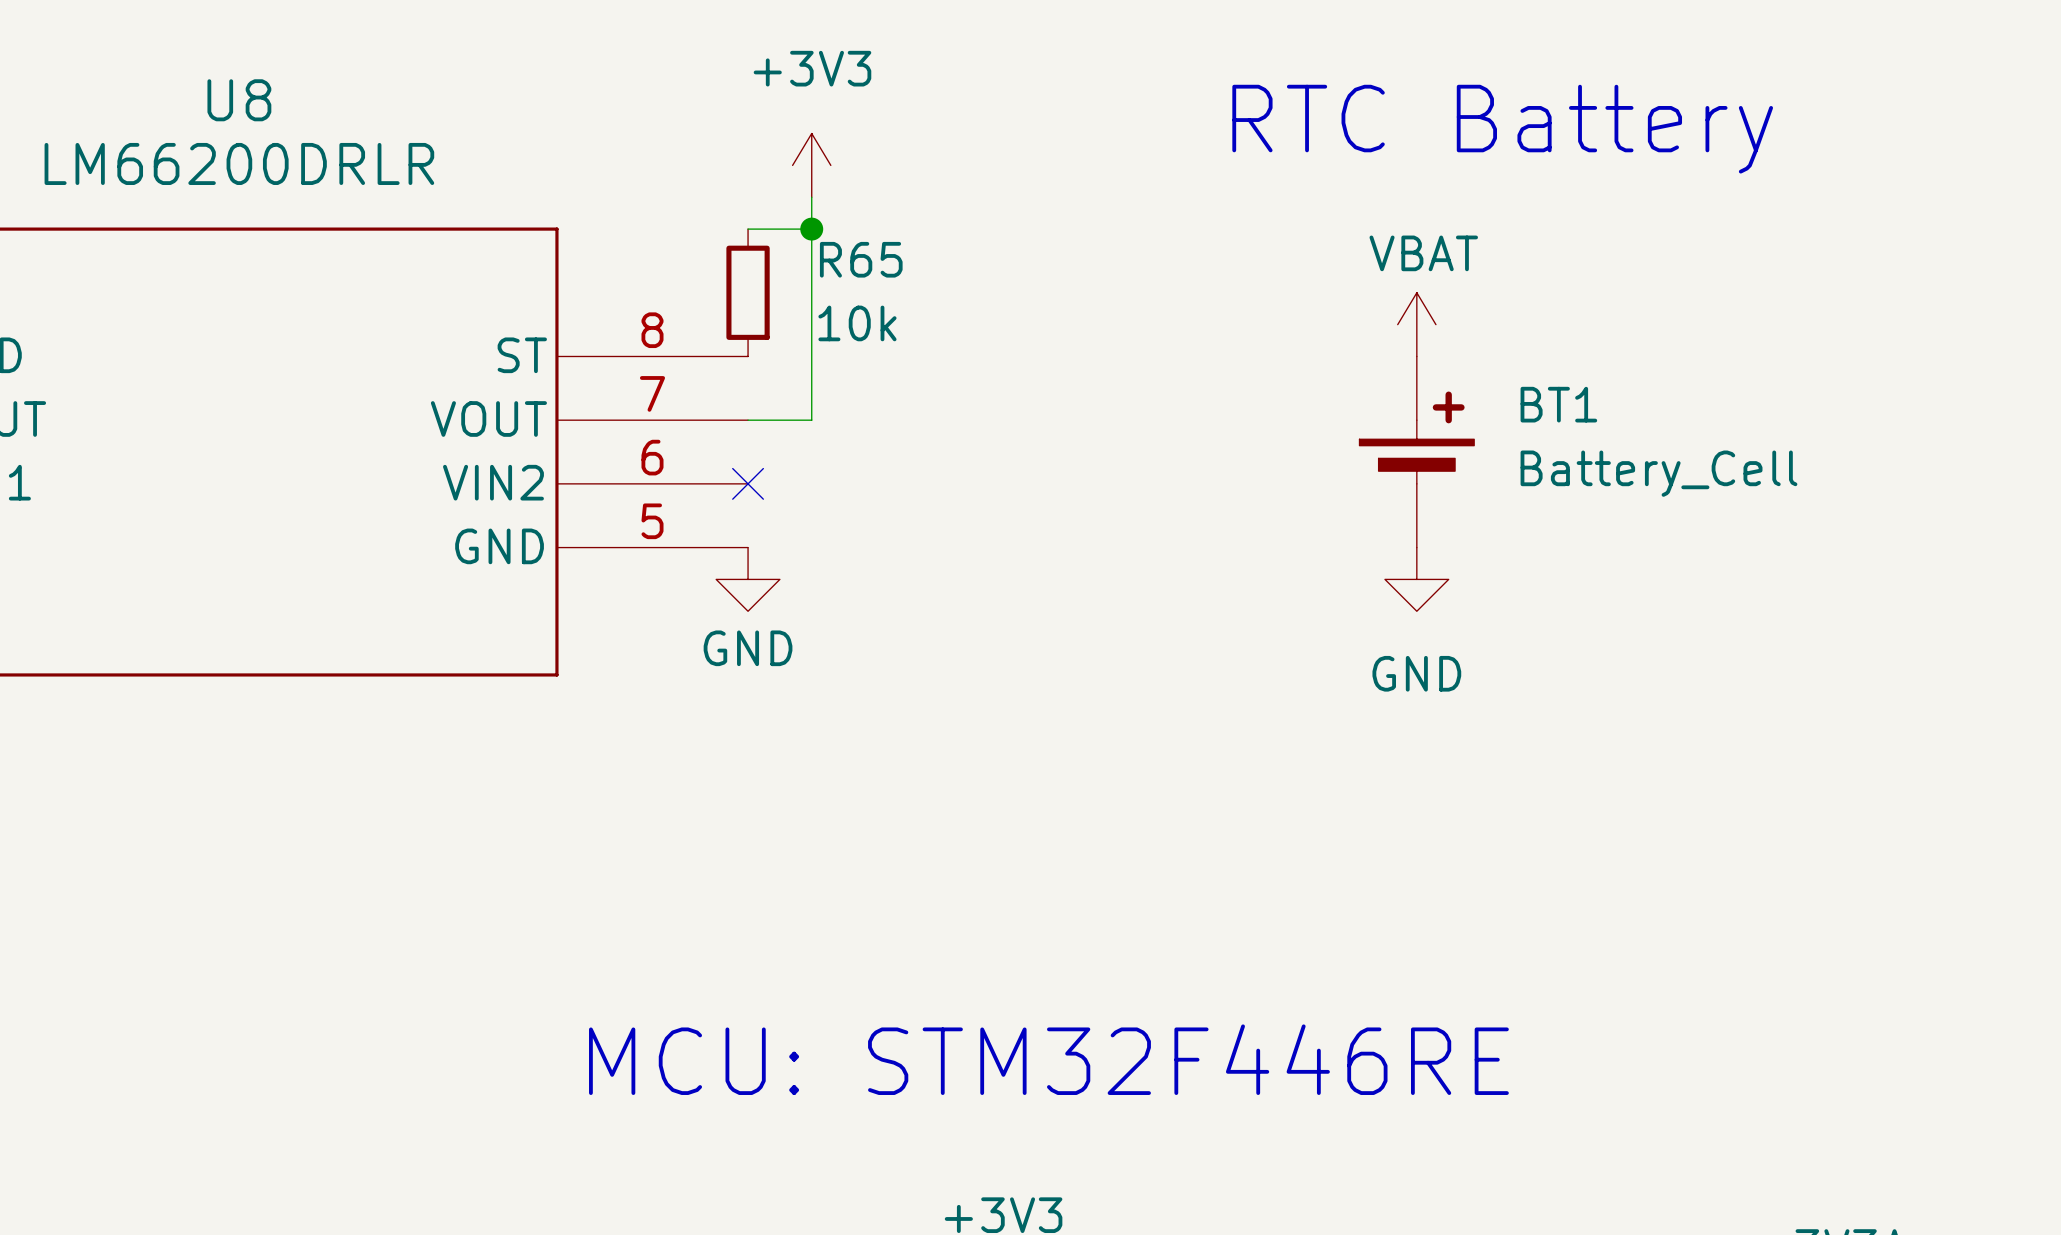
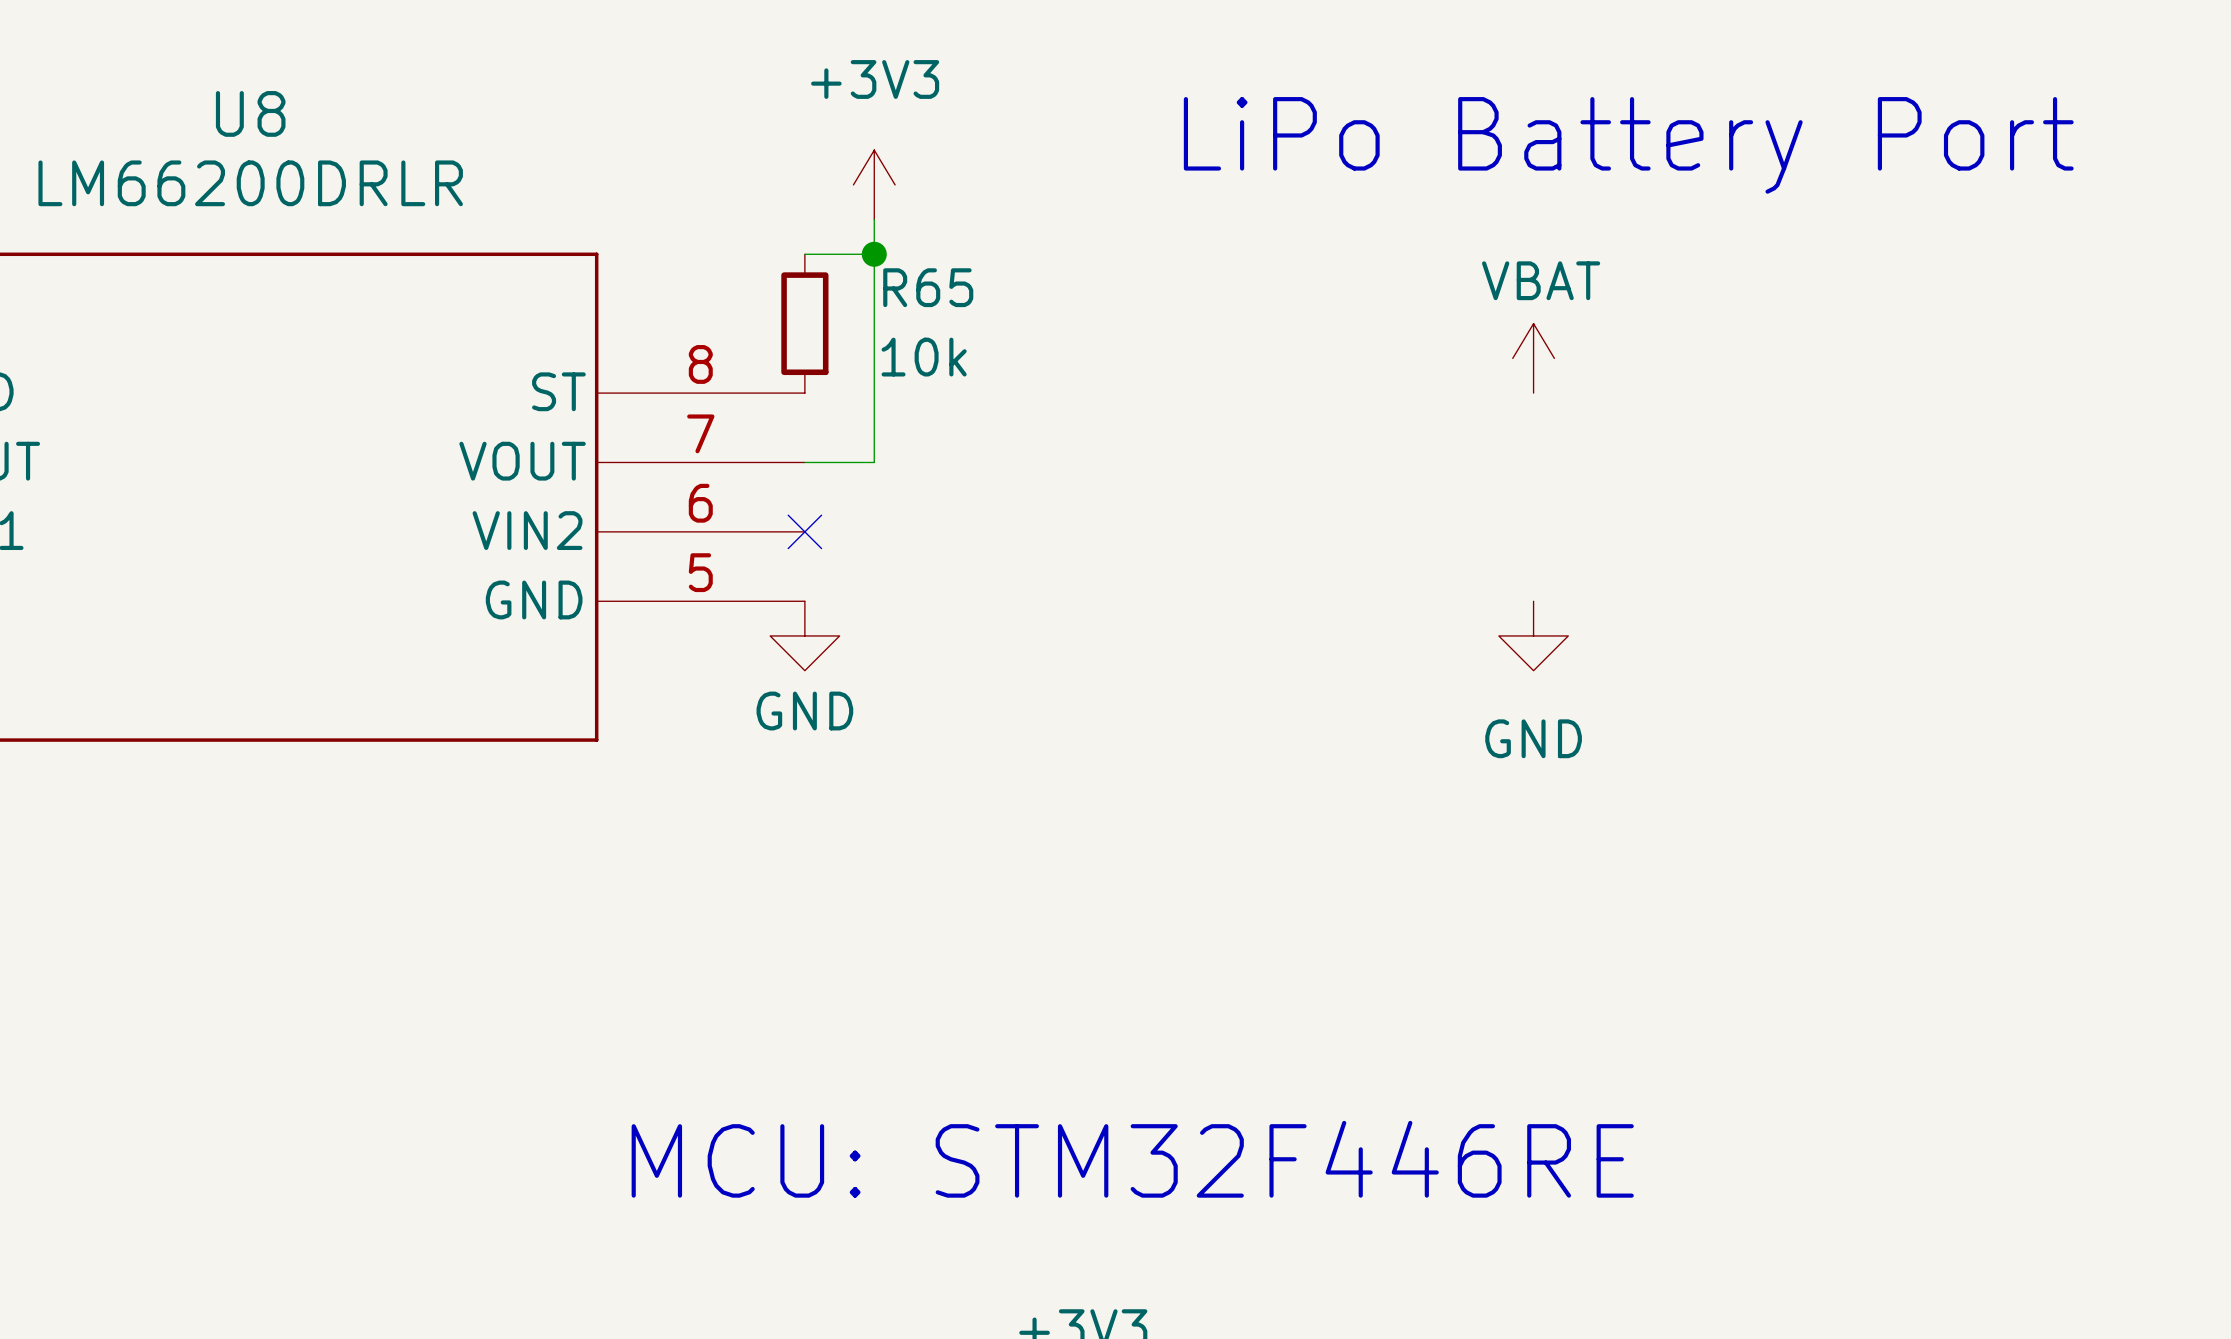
text: RTC Battery (1502, 129) -> LiPo Battery Port (1628, 145)
BT1: Battery_Cell (1416, 452) -> none

